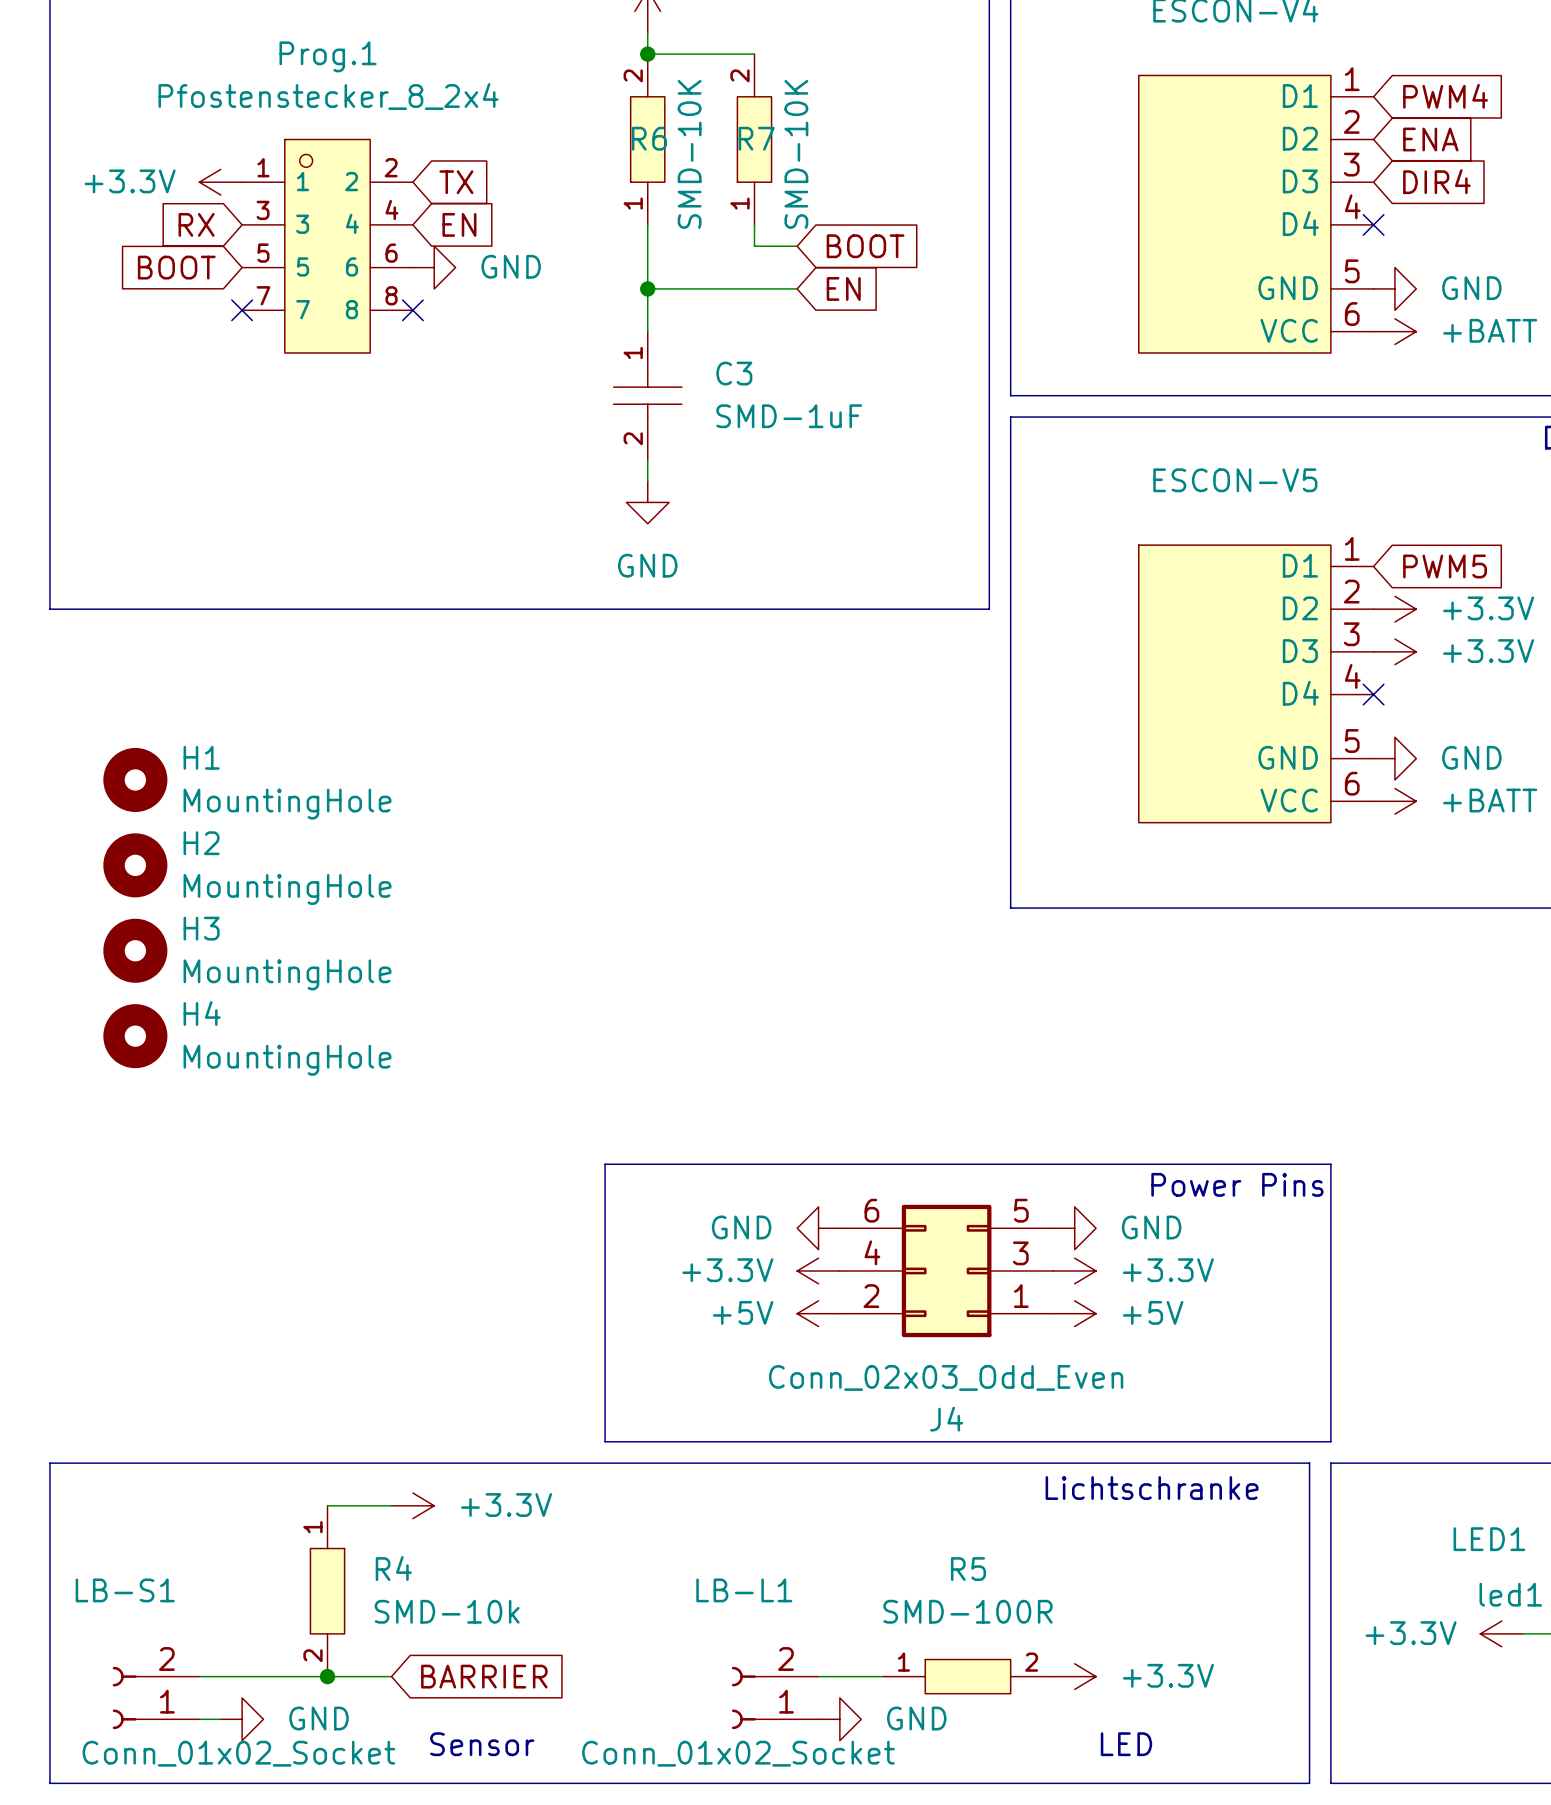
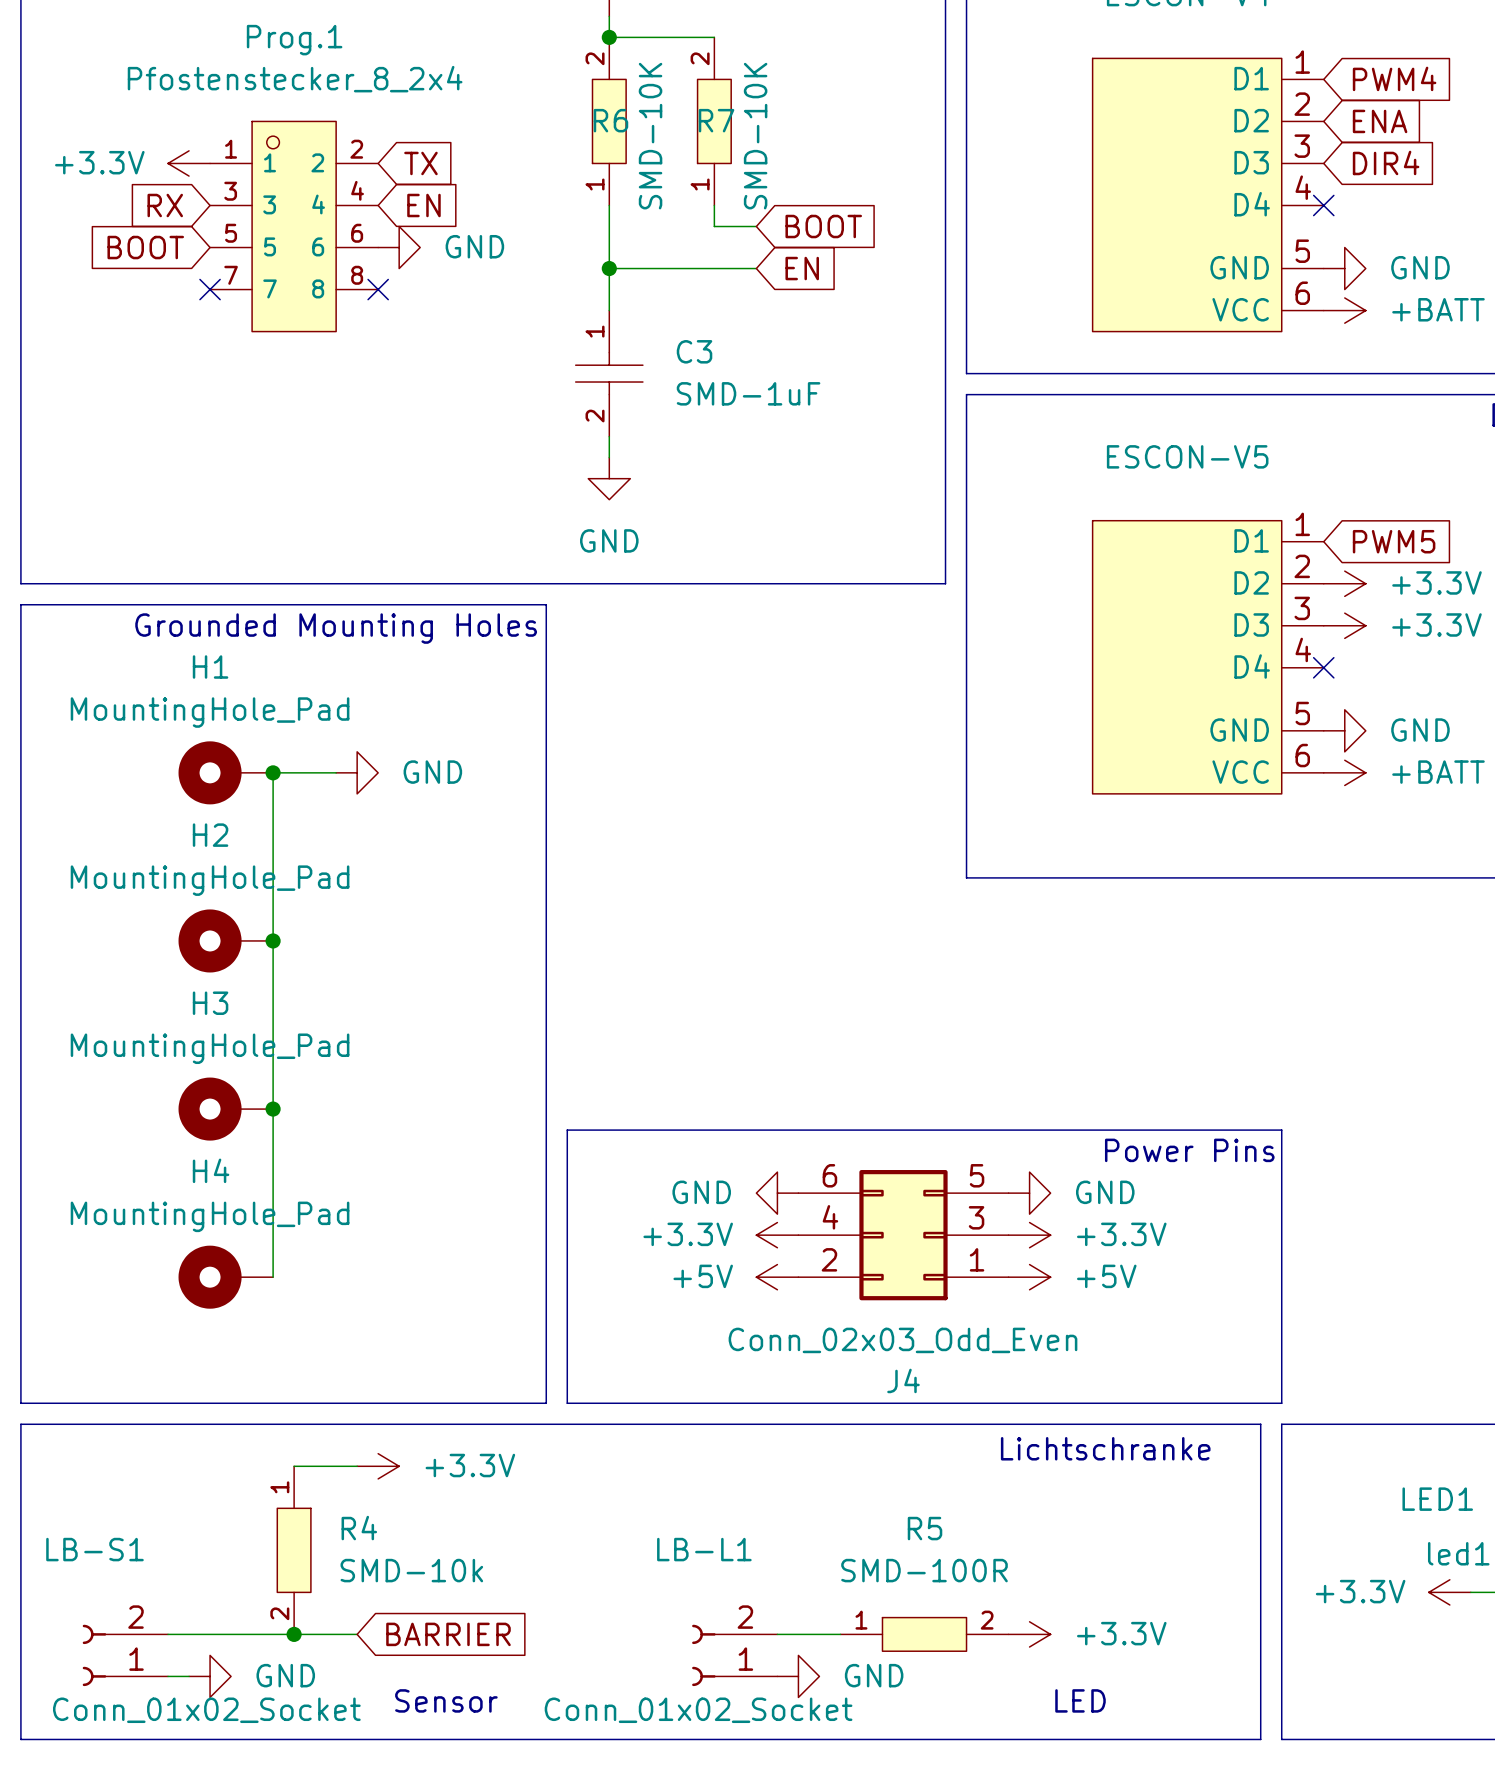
line: none -> (20, 604) (546, 604) (546, 1403) (20, 1403) (20, 604)
text: none -> Grounded Mounting Holes (336, 628)
H1 symbol: [103, 747, 168, 812] -> [178, 741, 274, 805]
H1 name position: H1 (201, 757) -> H1 (210, 667)
junction: none -> (273, 772)
wire: none -> (336, 772) (273, 772) (273, 1277)
power symbol: none -> GND (357, 772)
H1 value: MountingHole (287, 804) -> MountingHole_Pad (210, 712)
H2 symbol: [103, 833, 168, 898] -> [178, 909, 274, 973]
H2 name position: H2 (201, 843) -> H2 (210, 835)
H2 value: MountingHole (287, 889) -> MountingHole_Pad (210, 880)
H3 symbol: [103, 918, 168, 983] -> [178, 1077, 274, 1141]
H3 name position: H3 (201, 928) -> H3 (210, 1003)
junction: none -> (273, 940)
H3 value: MountingHole (287, 974) -> MountingHole_Pad (210, 1048)
H4 symbol: [103, 1004, 168, 1069] -> [178, 1245, 274, 1309]
H4 name position: H4 (202, 1013) -> H4 (211, 1170)
H4 value: MountingHole (287, 1060) -> MountingHole_Pad (210, 1216)
junction: none -> (273, 1109)

